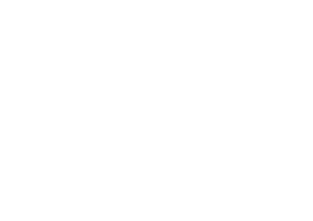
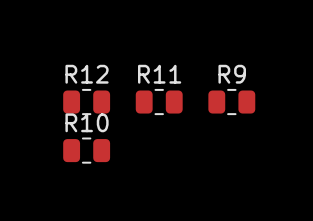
R12: none -> (86, 102)
R11: none -> (159, 102)
R9: none -> (231, 102)
R10: none -> (86, 150)

